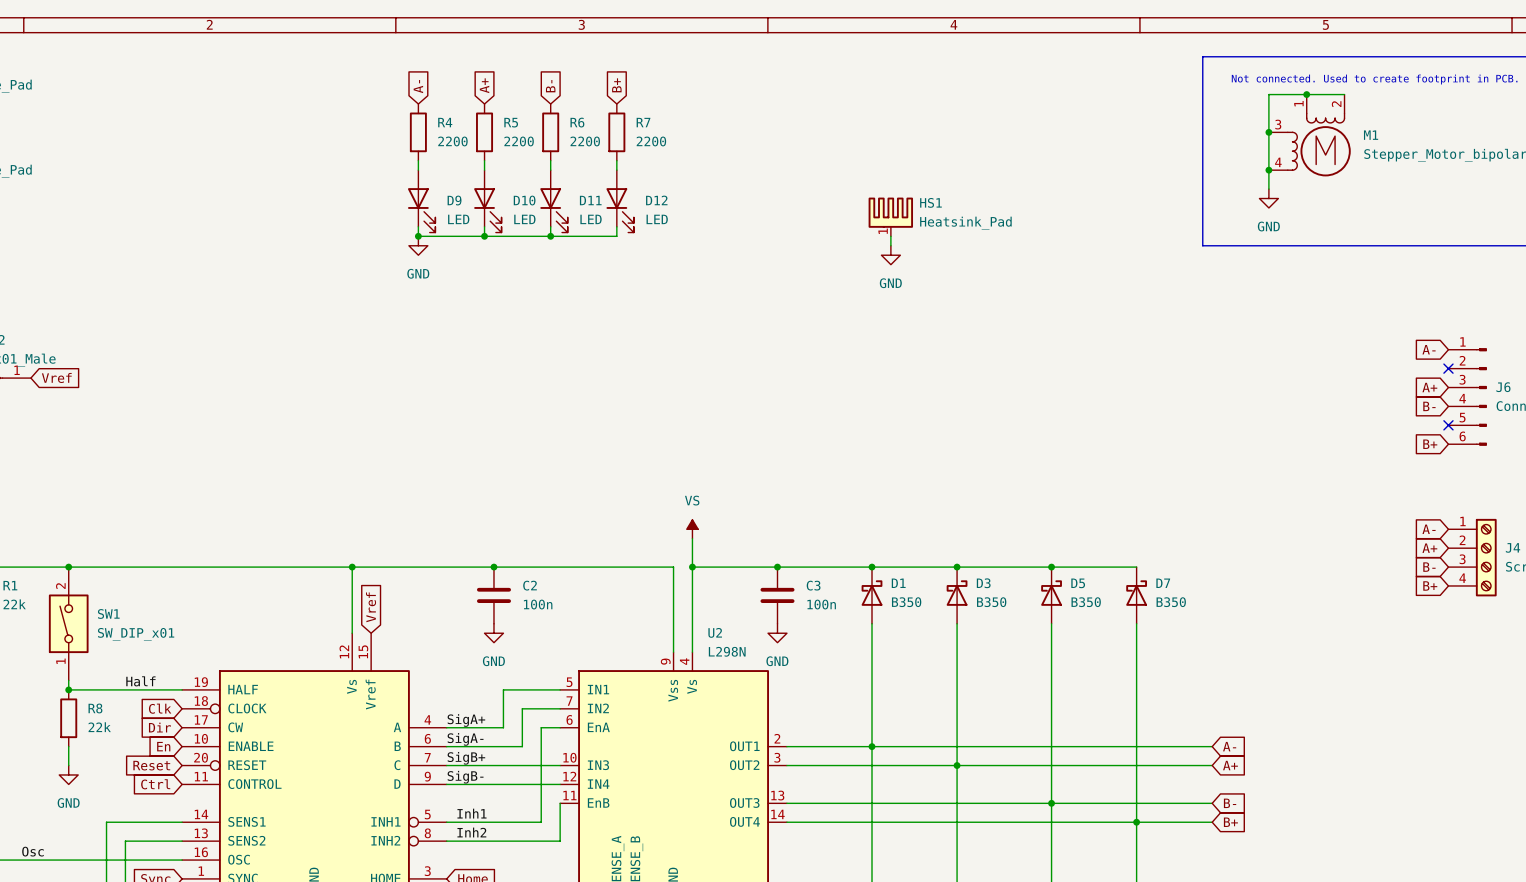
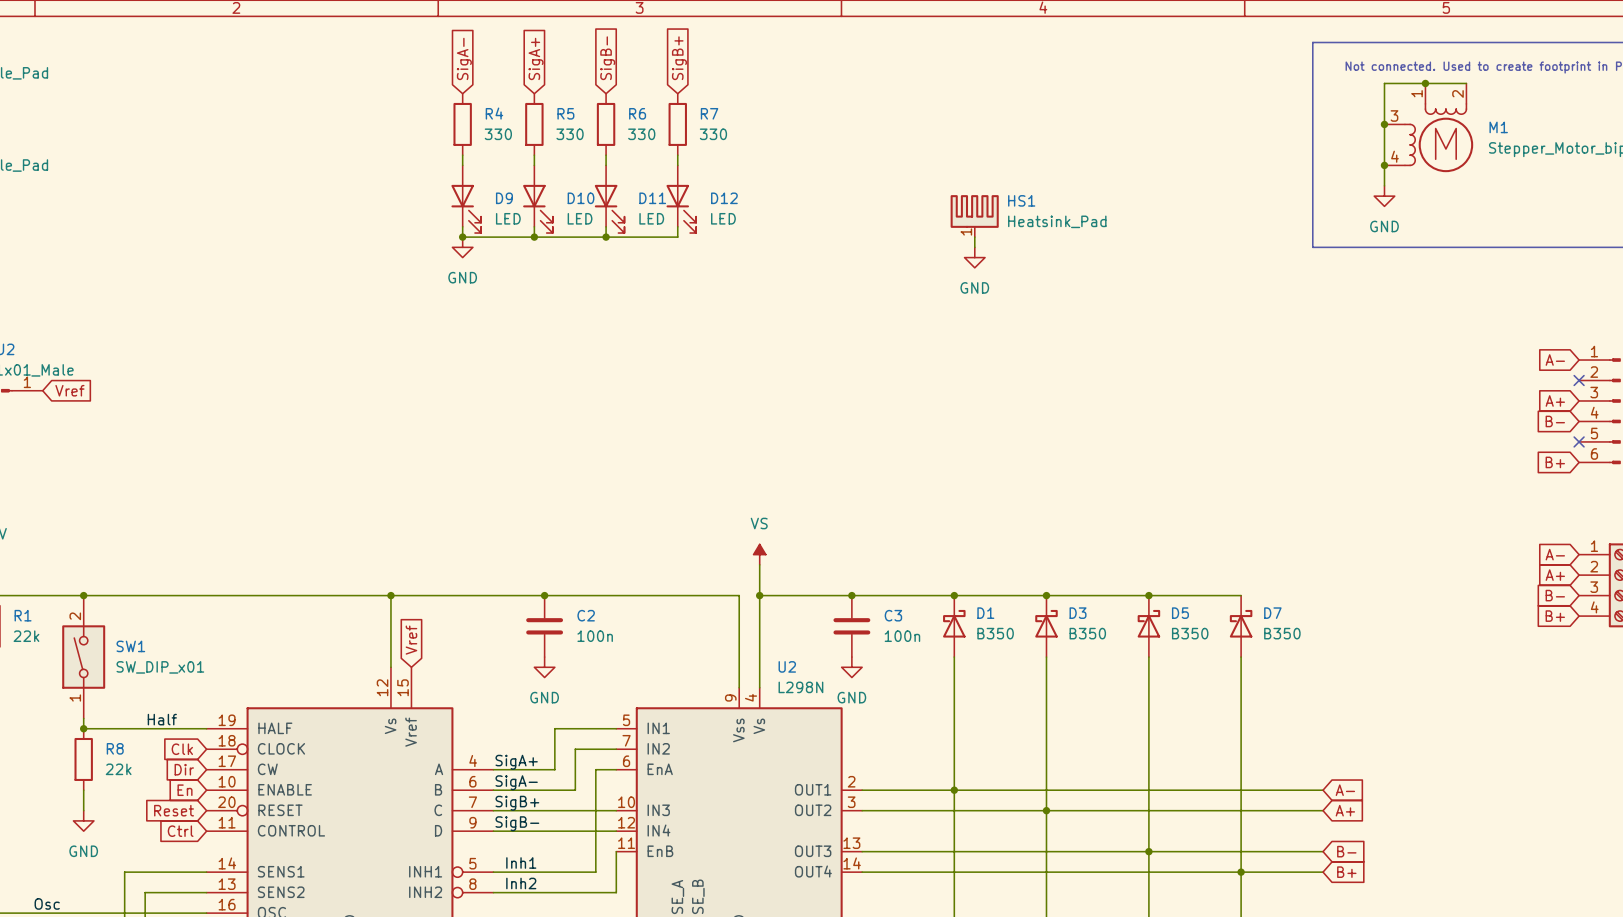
global label: A+ (484, 85) -> SigA+ (536, 58)
global label: B+ (616, 85) -> SigB+ (679, 58)
global label: A- (418, 86) -> SigA- (464, 58)
global label: B- (550, 86) -> SigB- (607, 58)
R4 value: 2200 (452, 141) -> 330 (498, 134)
R5 value: 2200 (519, 141) -> 330 (570, 134)
R6 value: 2200 (585, 141) -> 330 (641, 134)
R7 value: 2200 (651, 141) -> 330 (713, 134)

